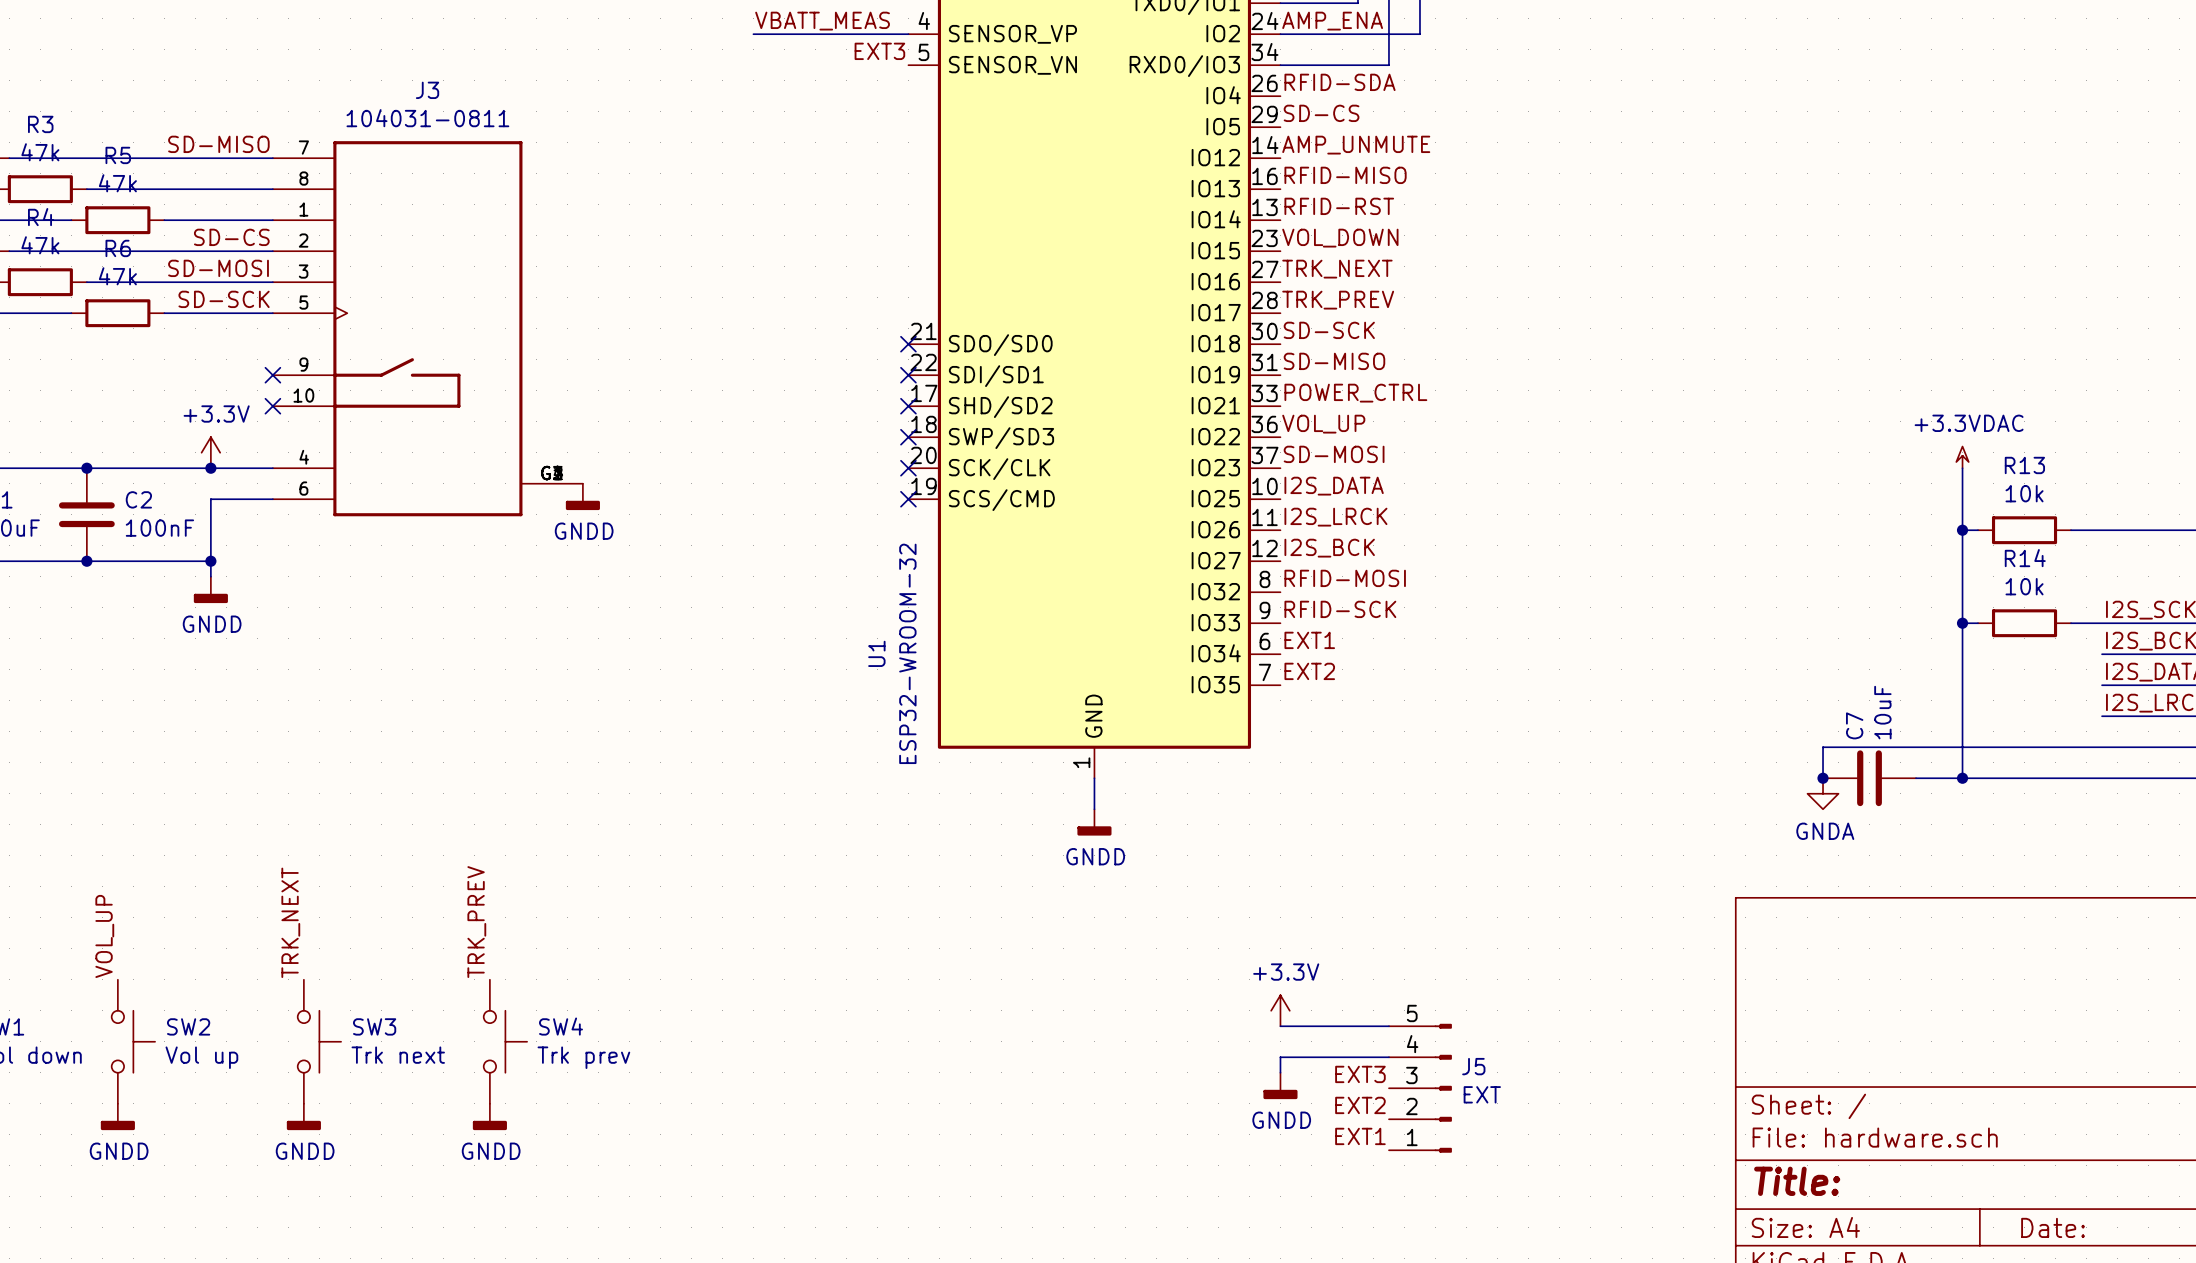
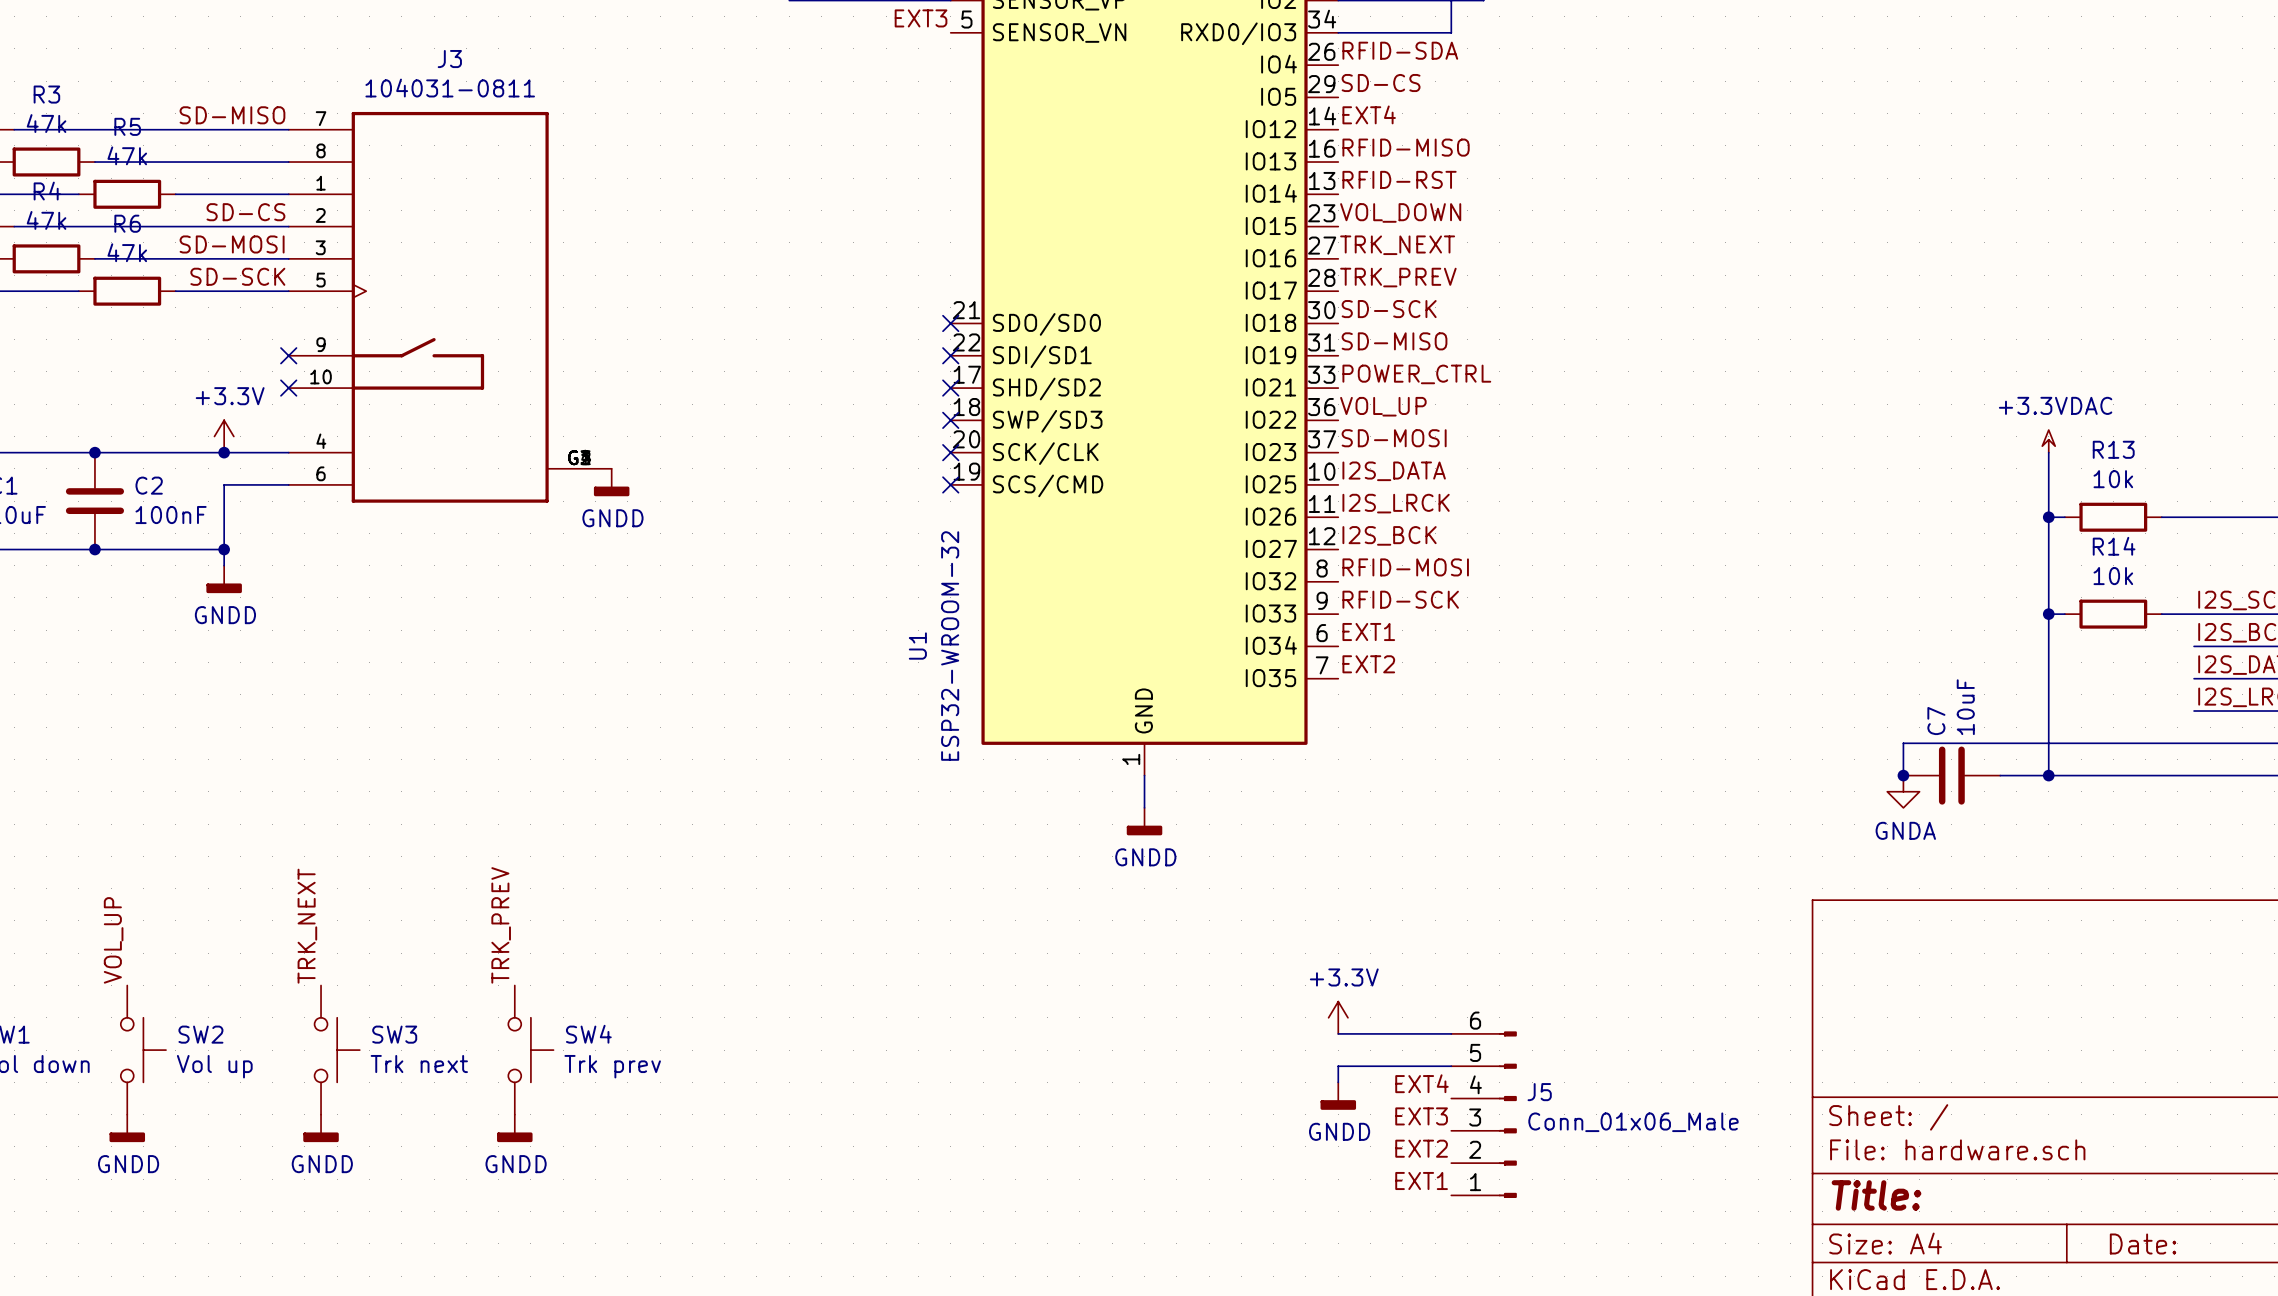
label: AMP_UNMUTE (1356, 145) -> EXT4 (1369, 114)
J5 symbol: [1388, 1023, 1452, 1153] -> [1451, 1031, 1517, 1198]
label: EXT3 (1360, 1074) -> EXT4 (1421, 1083)
J5 value: EXT (1482, 1094) -> Conn_01x06_Male (1633, 1122)
label: EXT2 (1360, 1105) -> EXT3 (1421, 1116)
label: EXT1 (1360, 1136) -> EXT2 (1421, 1148)
label: none -> EXT1 (1421, 1181)

